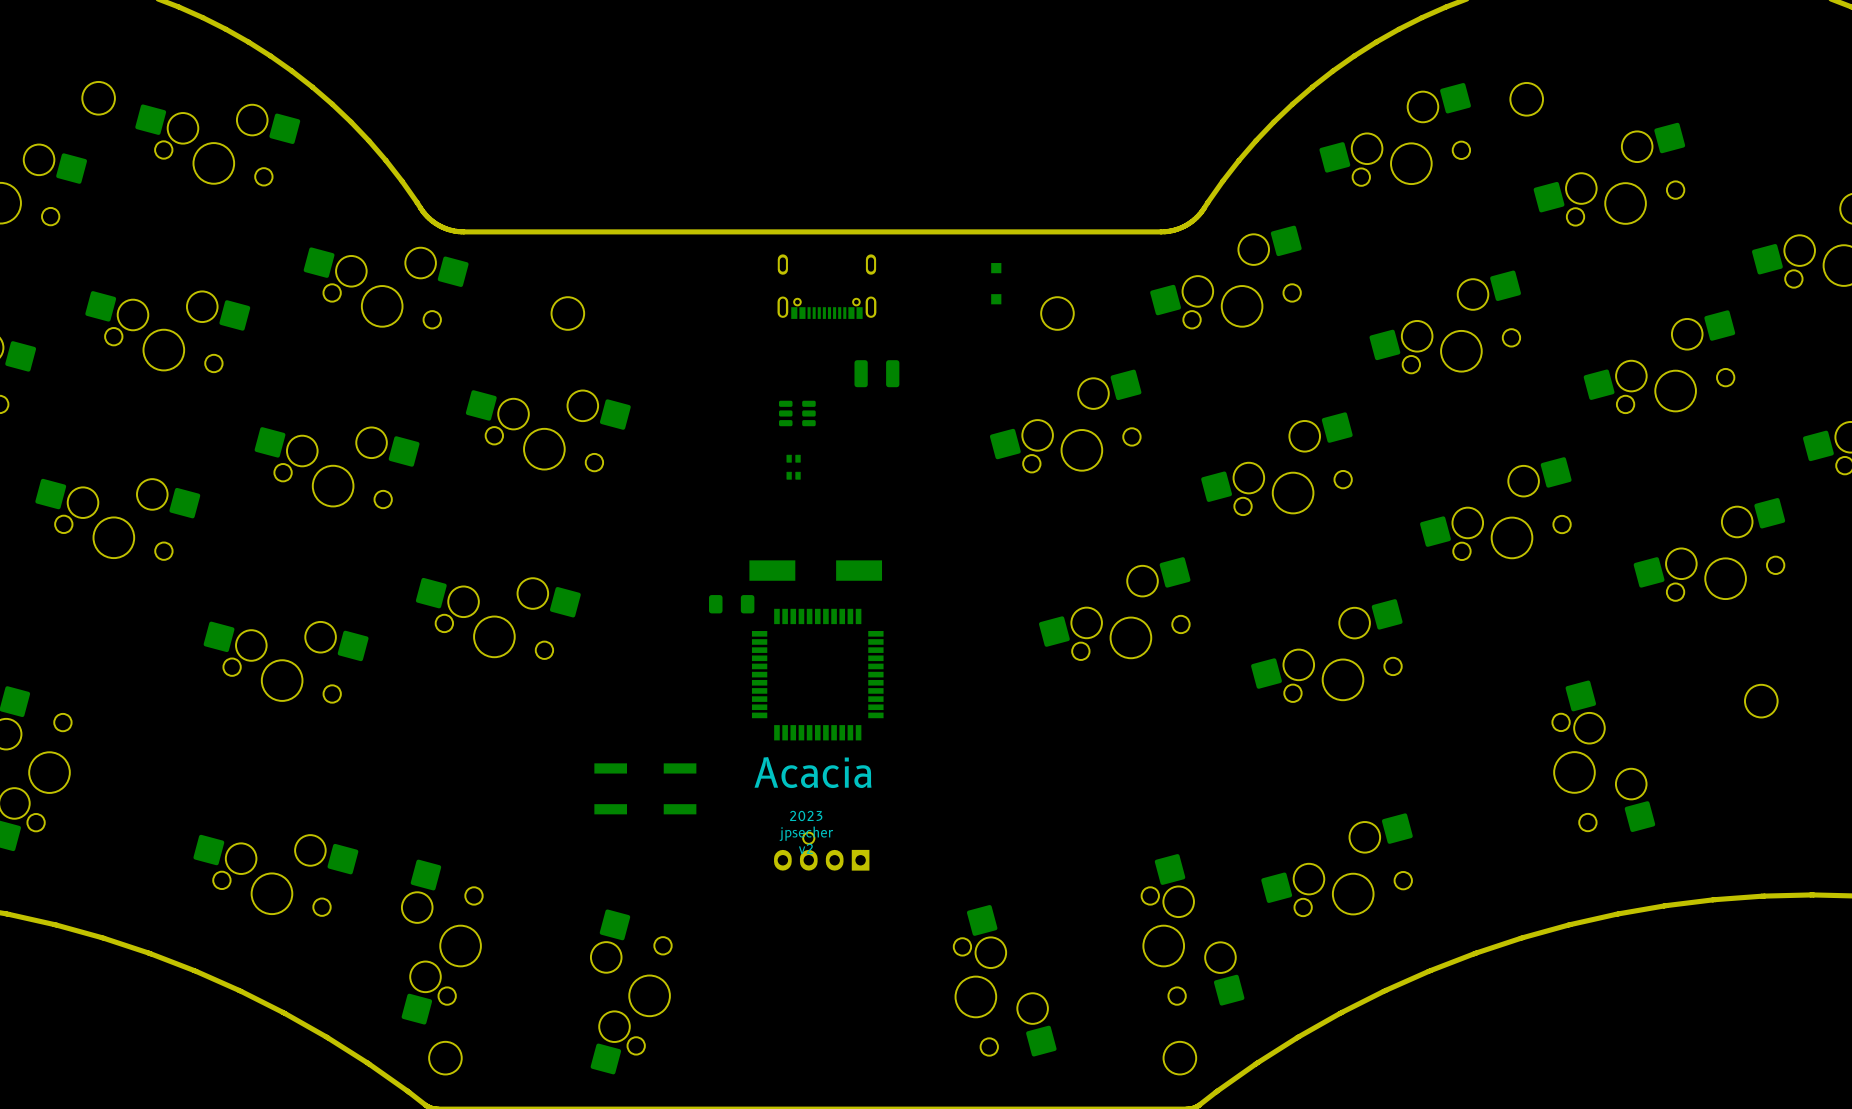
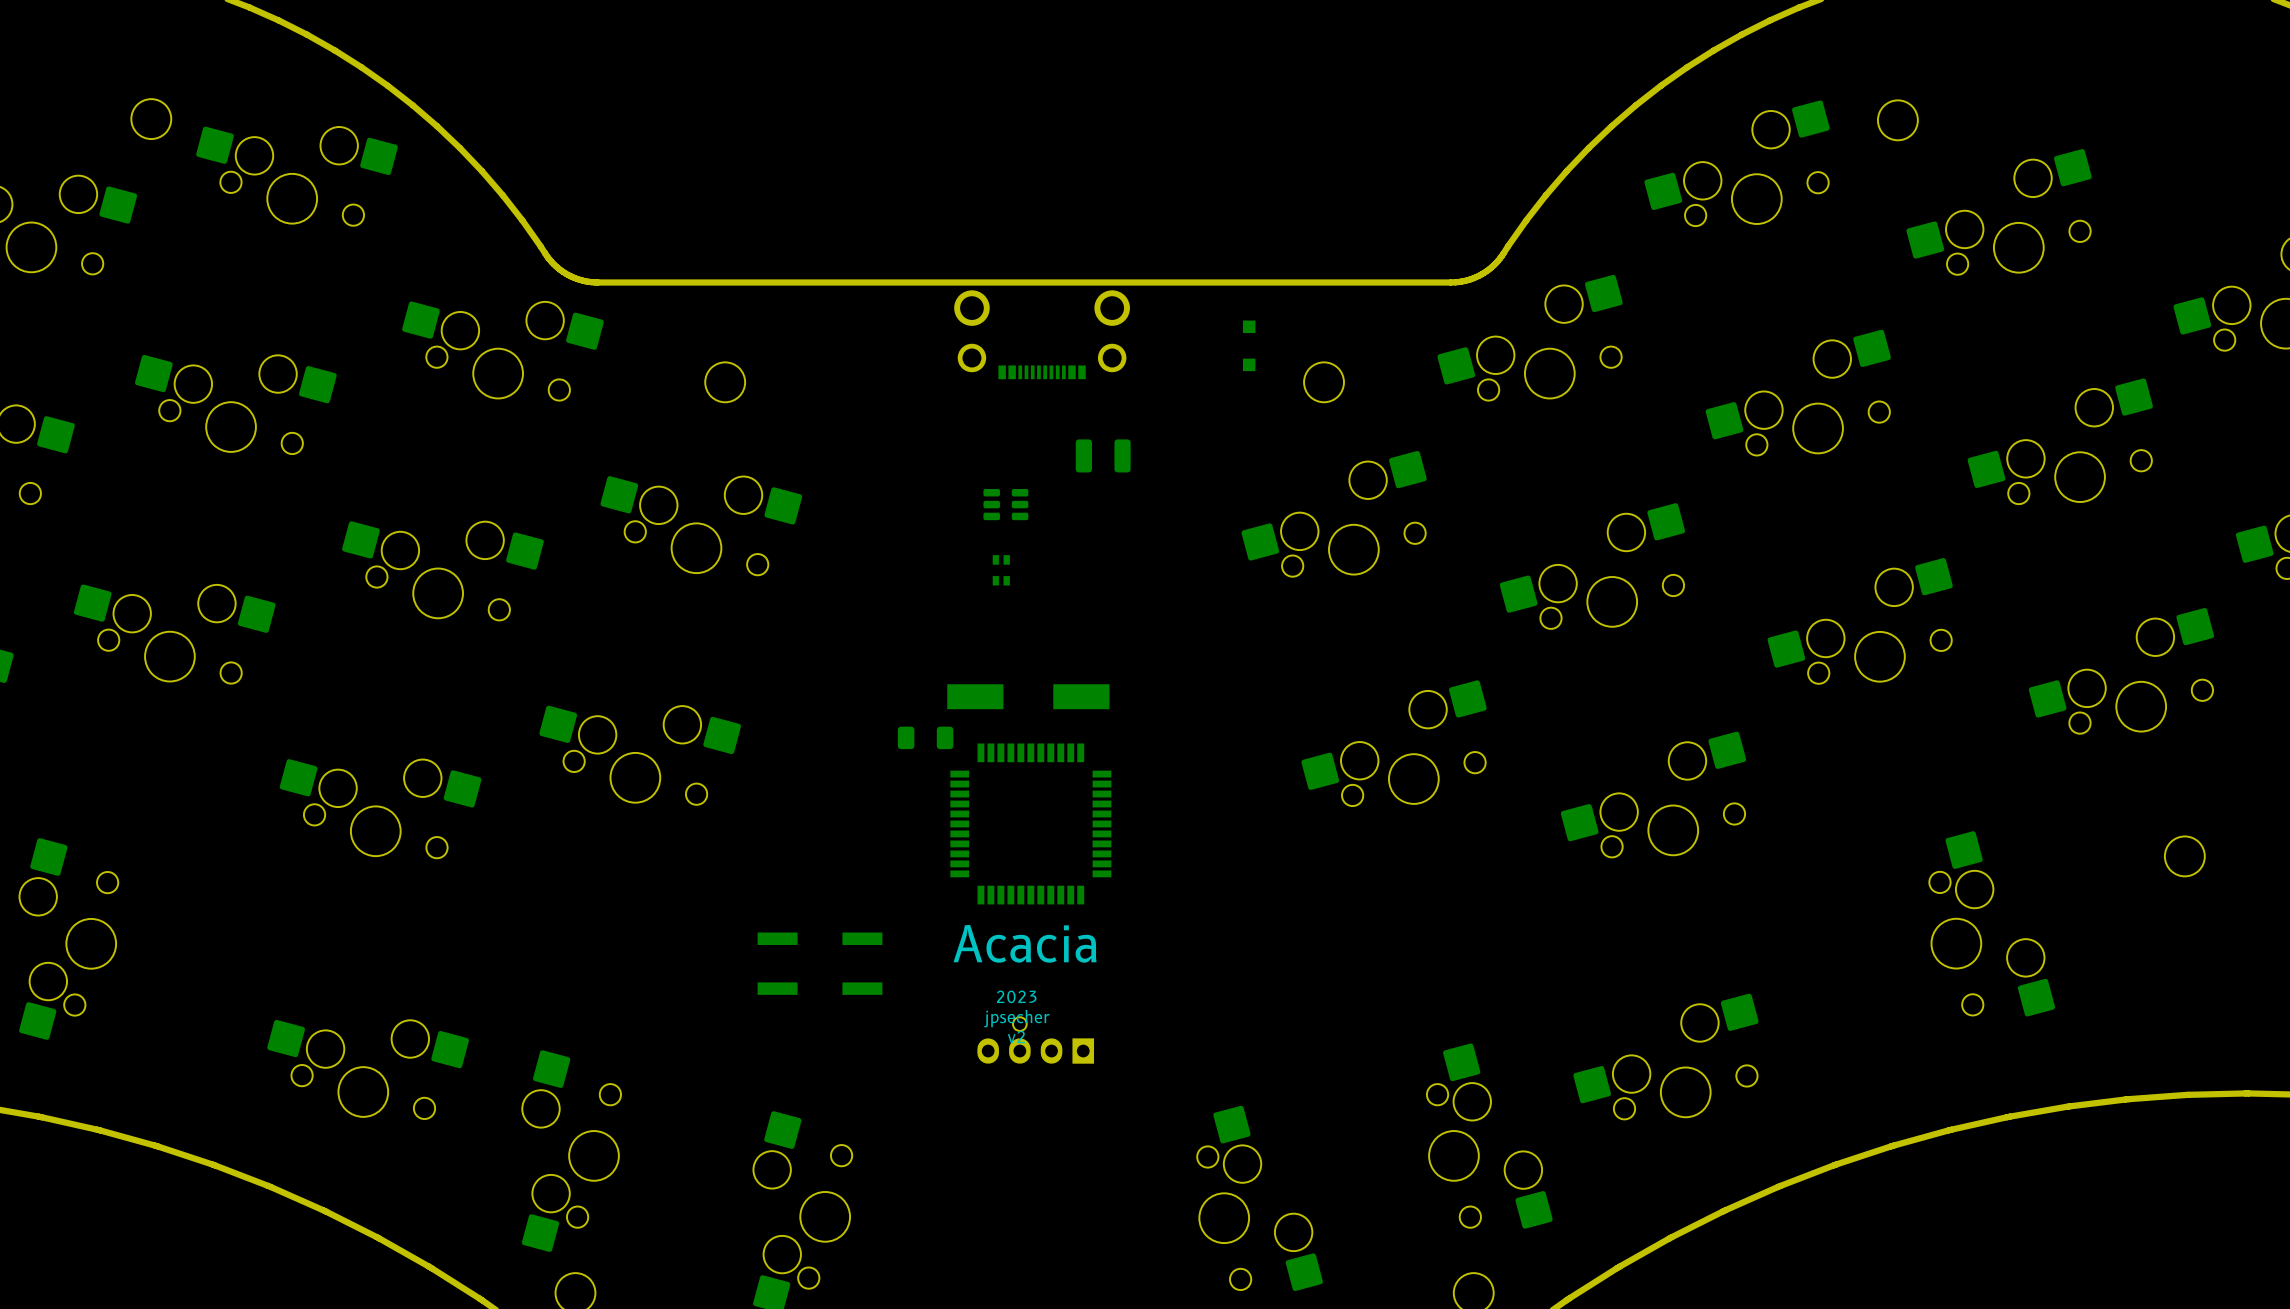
part: none -> (1042, 334)
part: (826, 286) -> none

